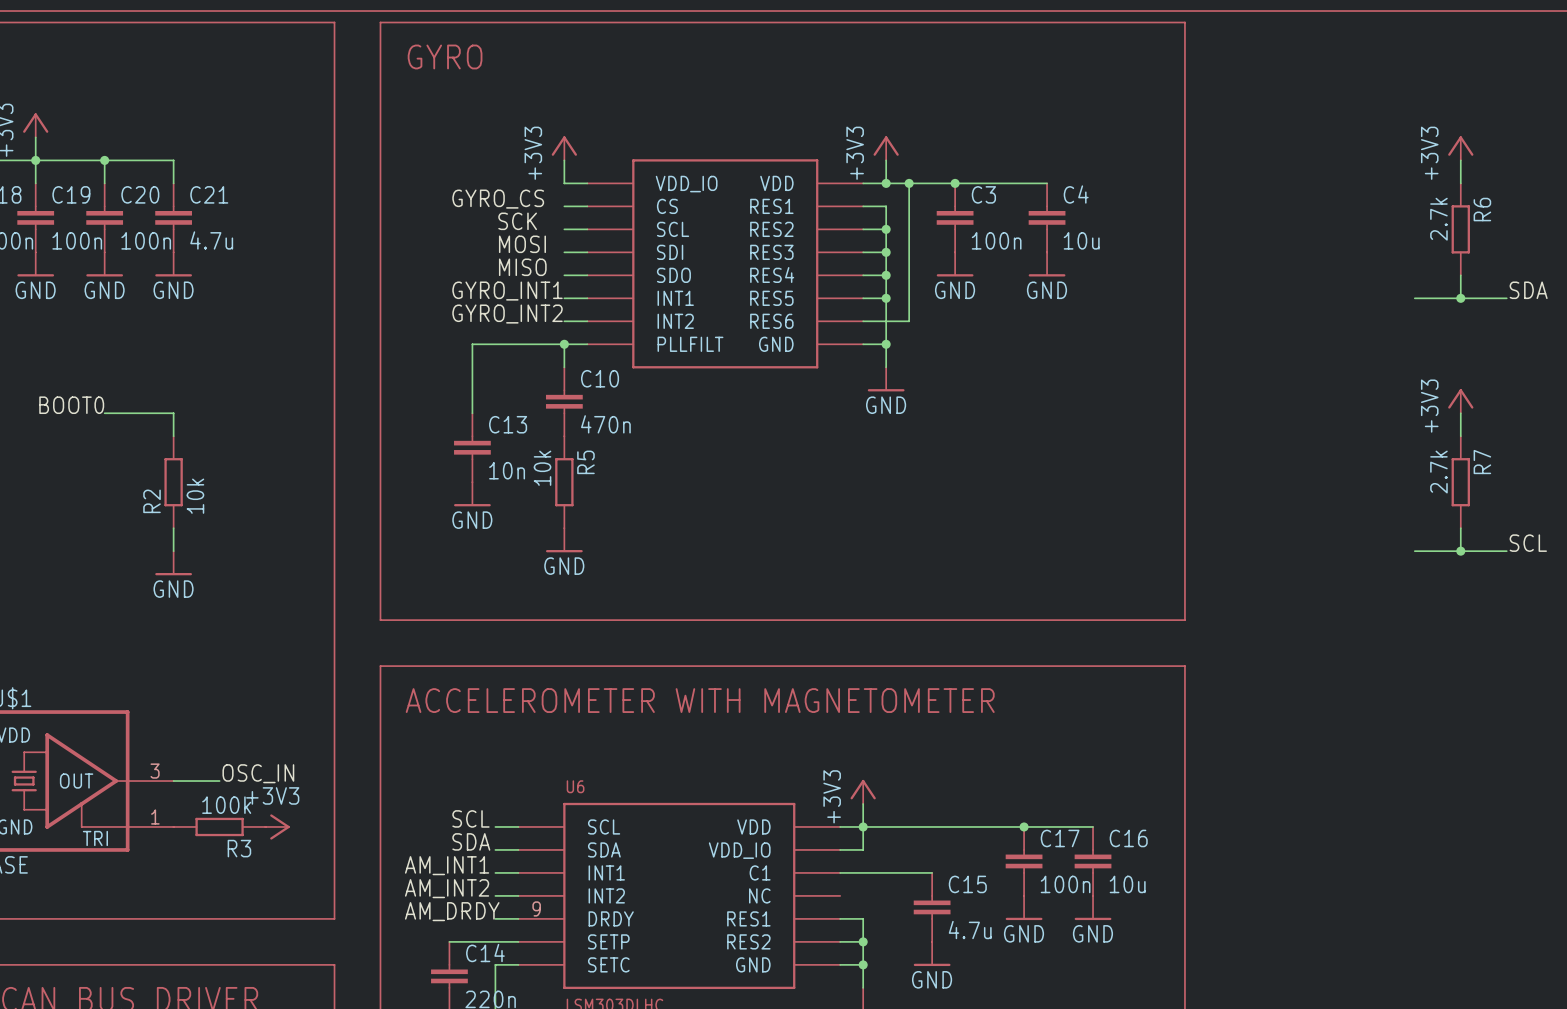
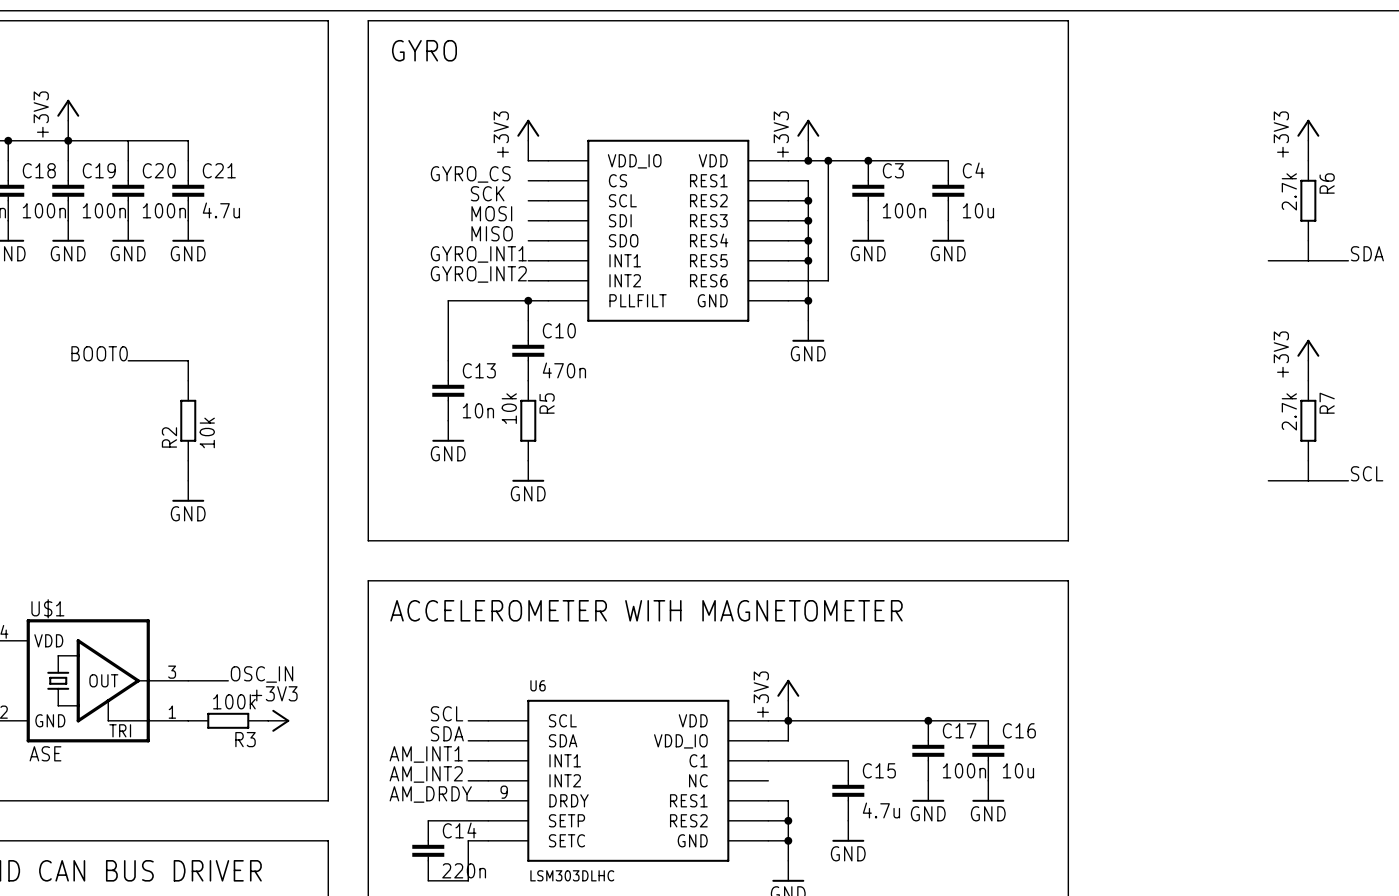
junction: (104, 160) -> none
junction: (1460, 298) -> none
junction: (1460, 551) -> none

